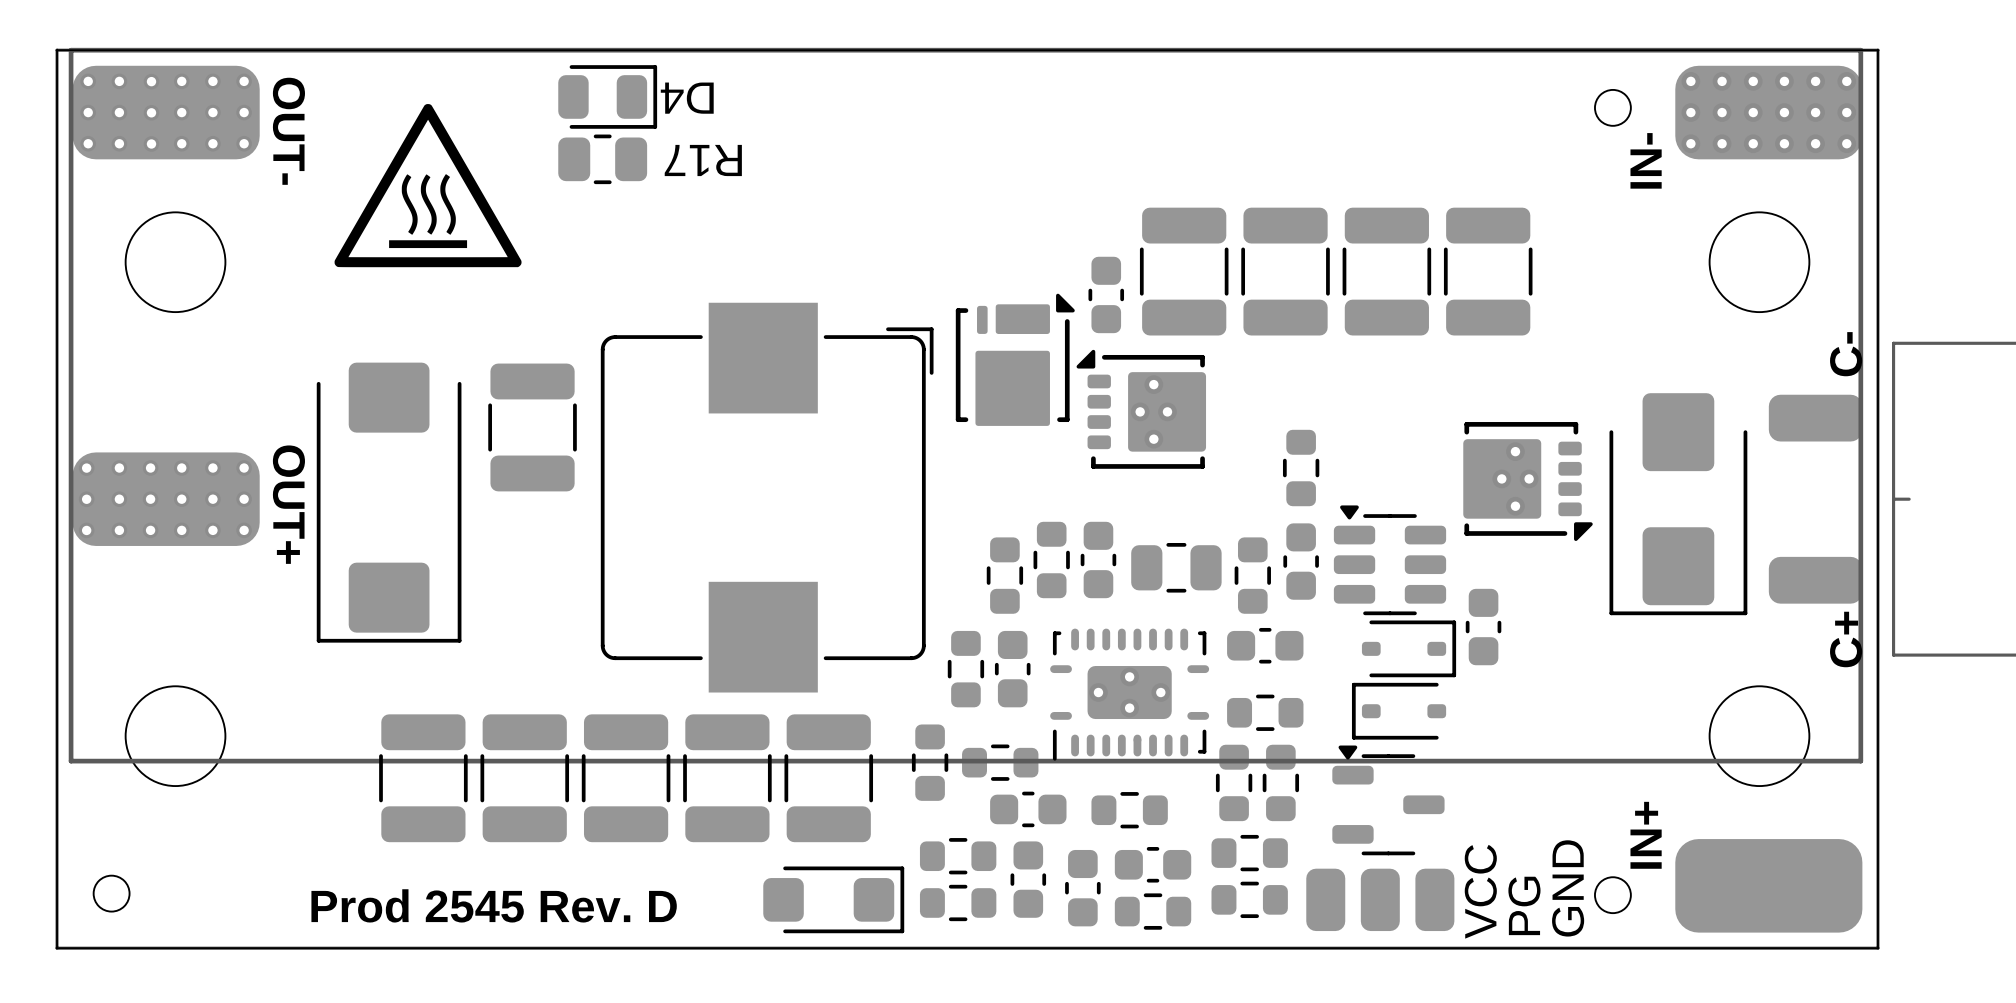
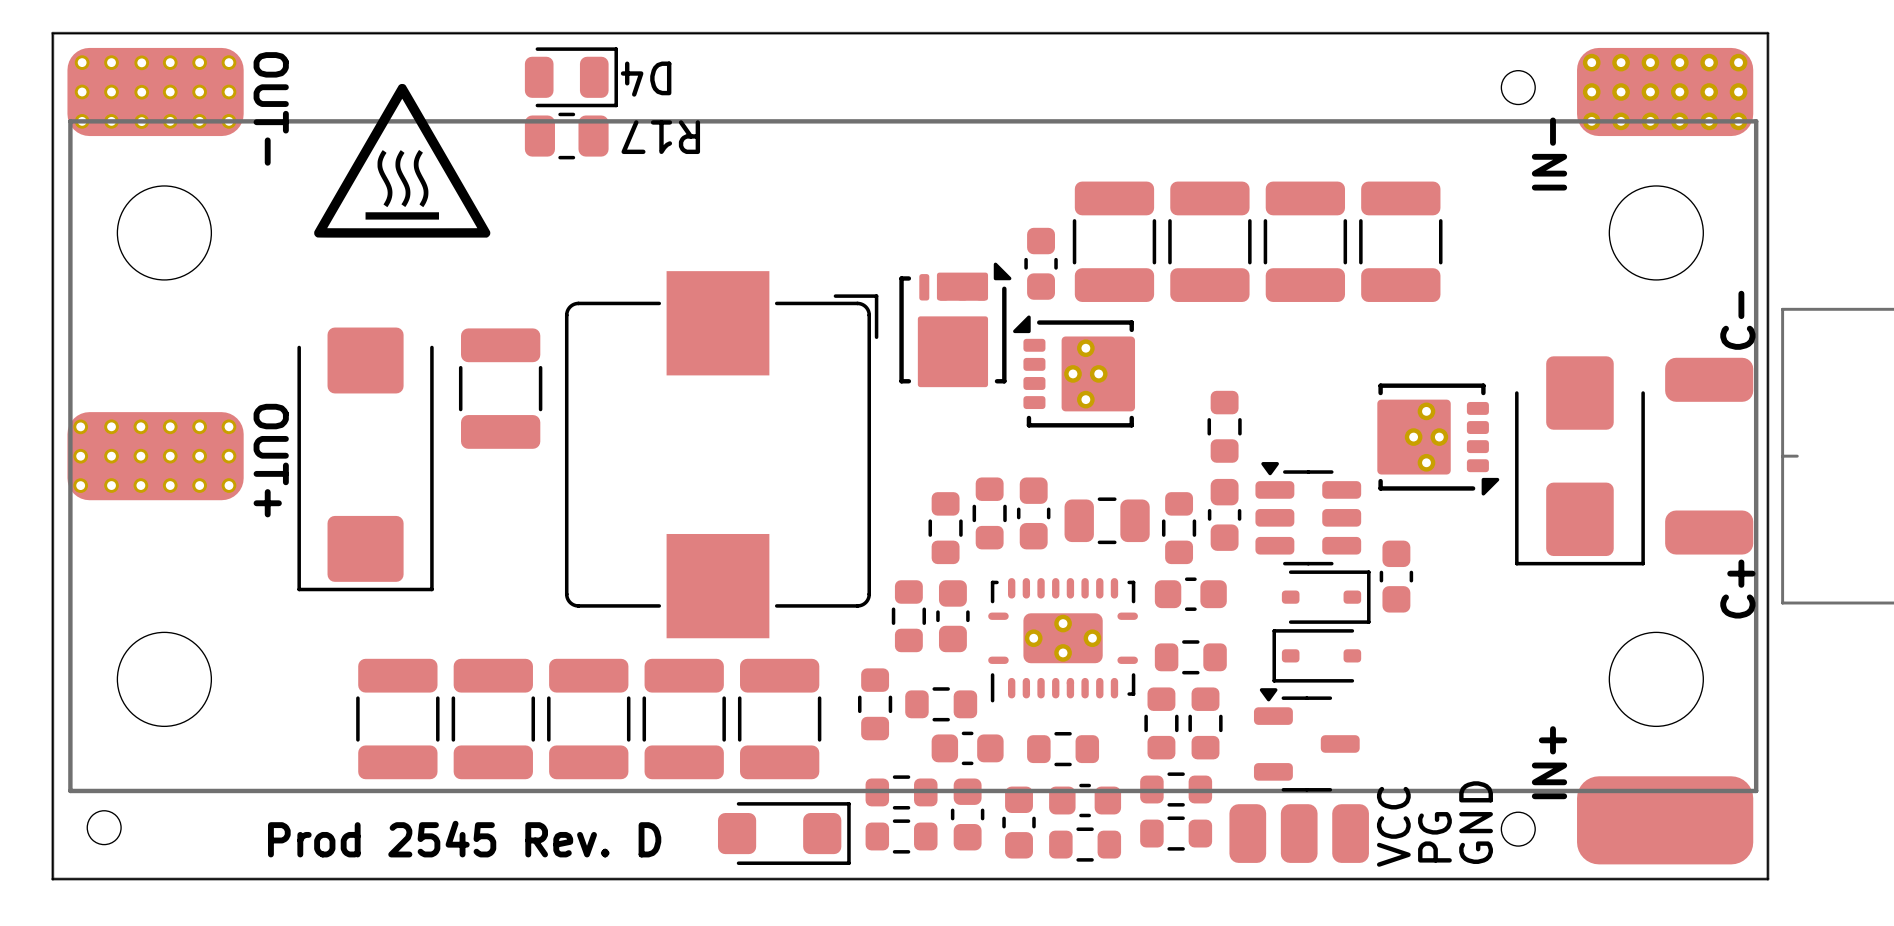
line: (71, 50) (1860, 50) (1860, 761) (71, 761) (71, 50) -> (70, 121) (1756, 121) (1756, 790) (70, 790) (70, 121)

